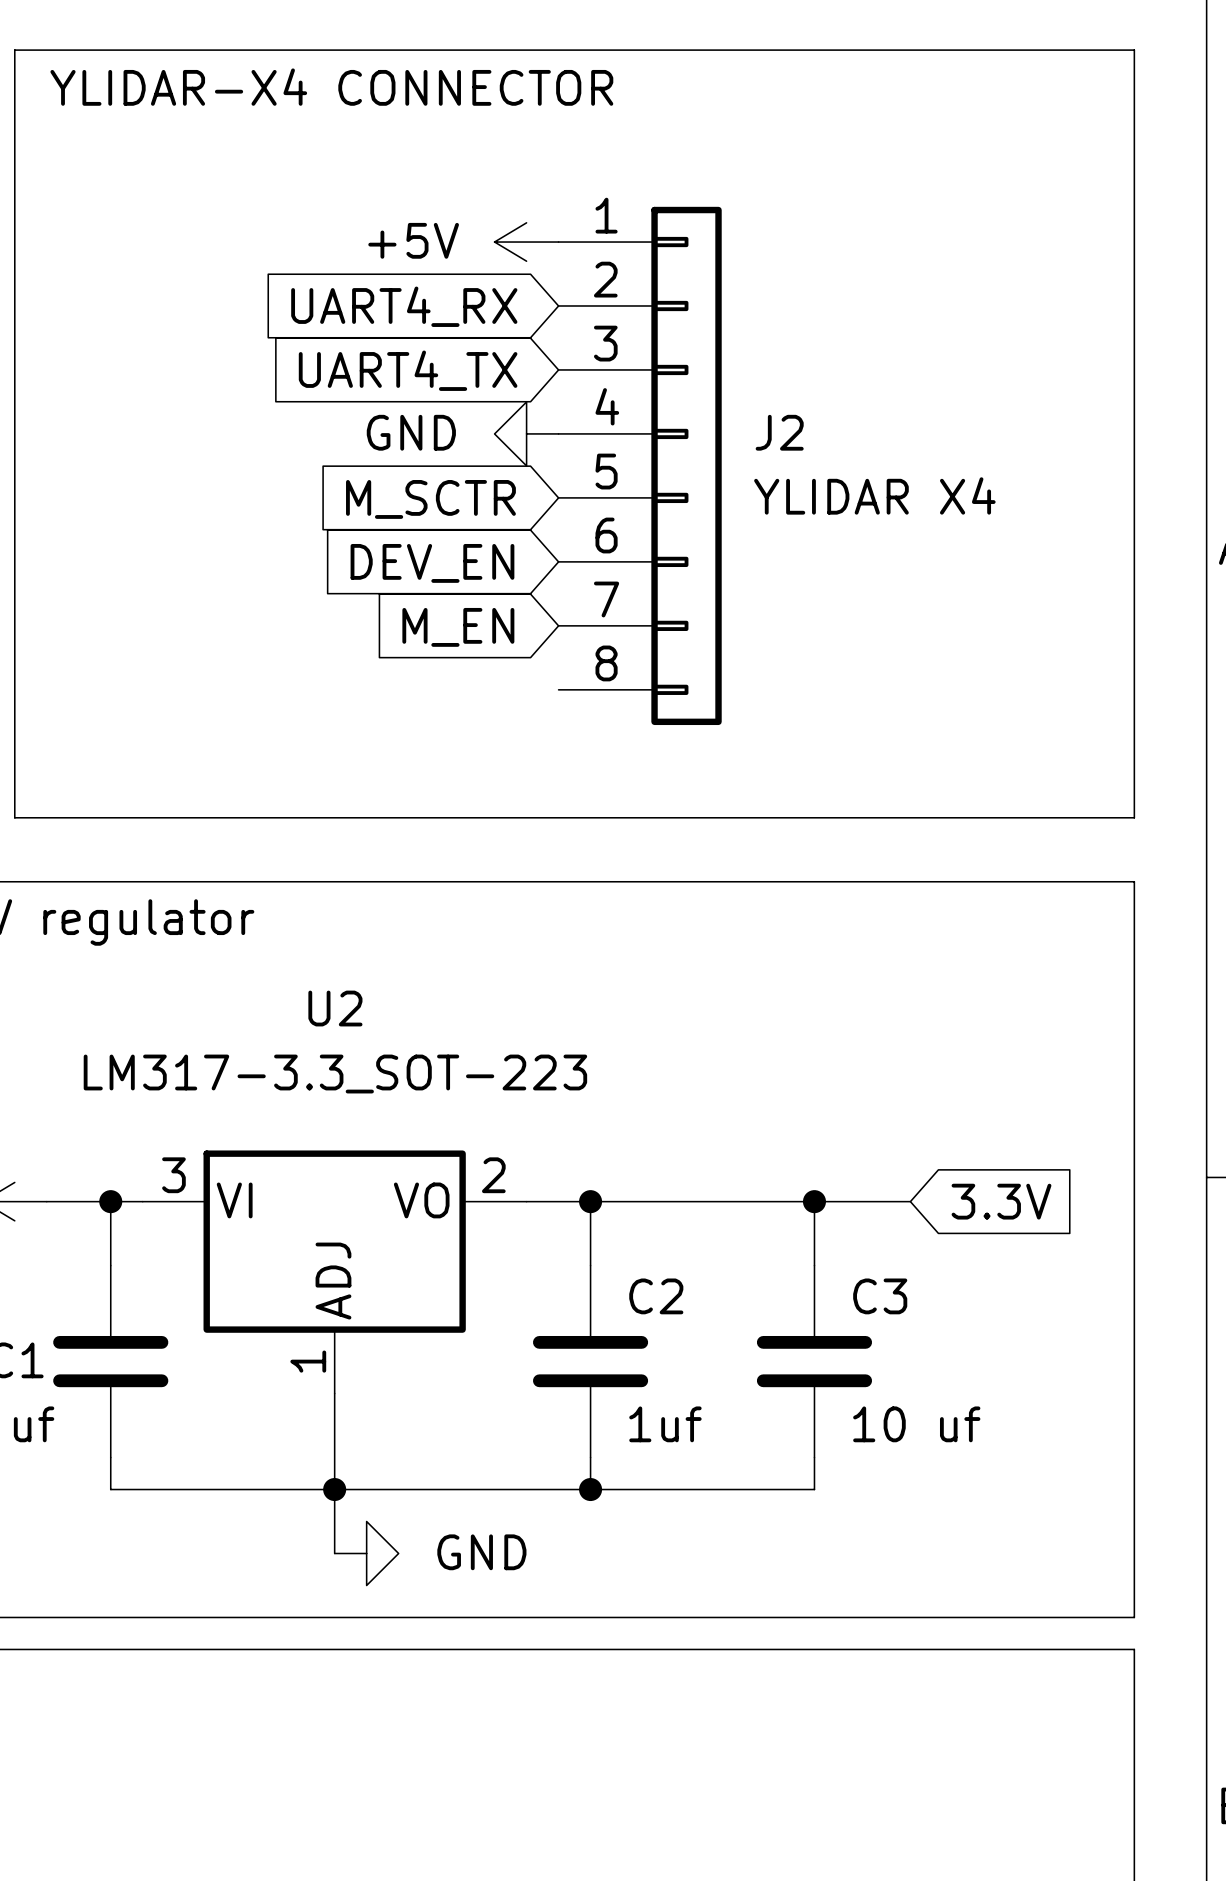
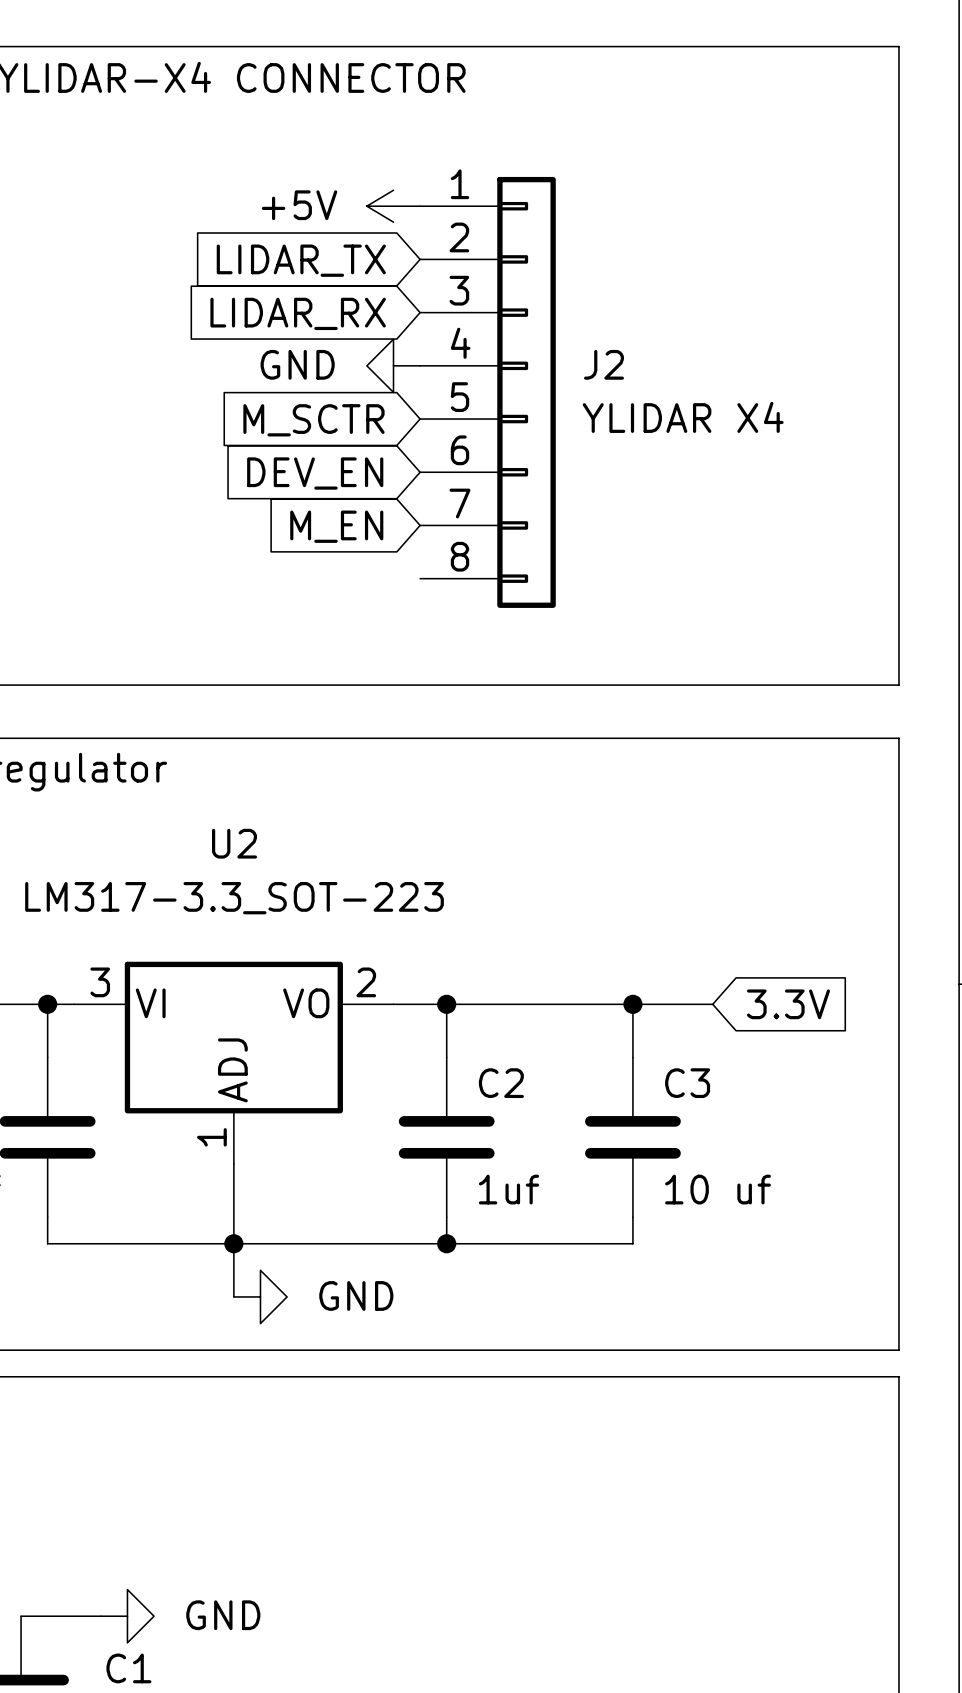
global label: UART4_RX (404, 306) -> LIDAR_TX (301, 260)
global label: UART4_TX (408, 370) -> LIDAR_RX (298, 313)

